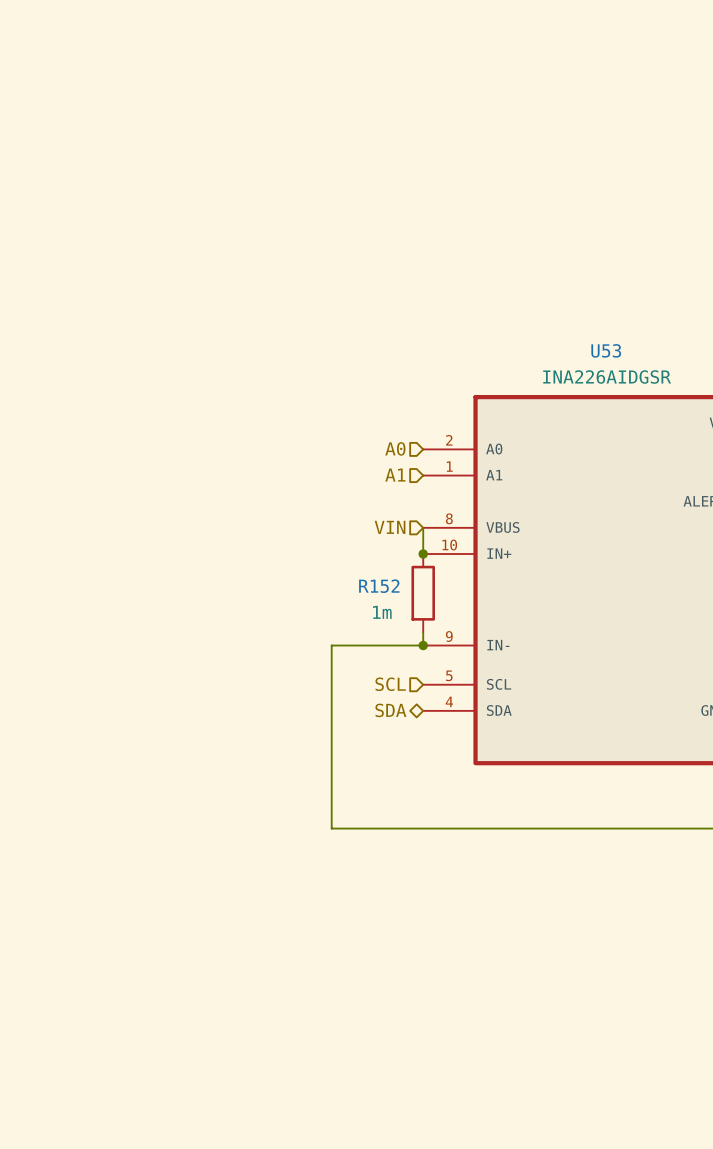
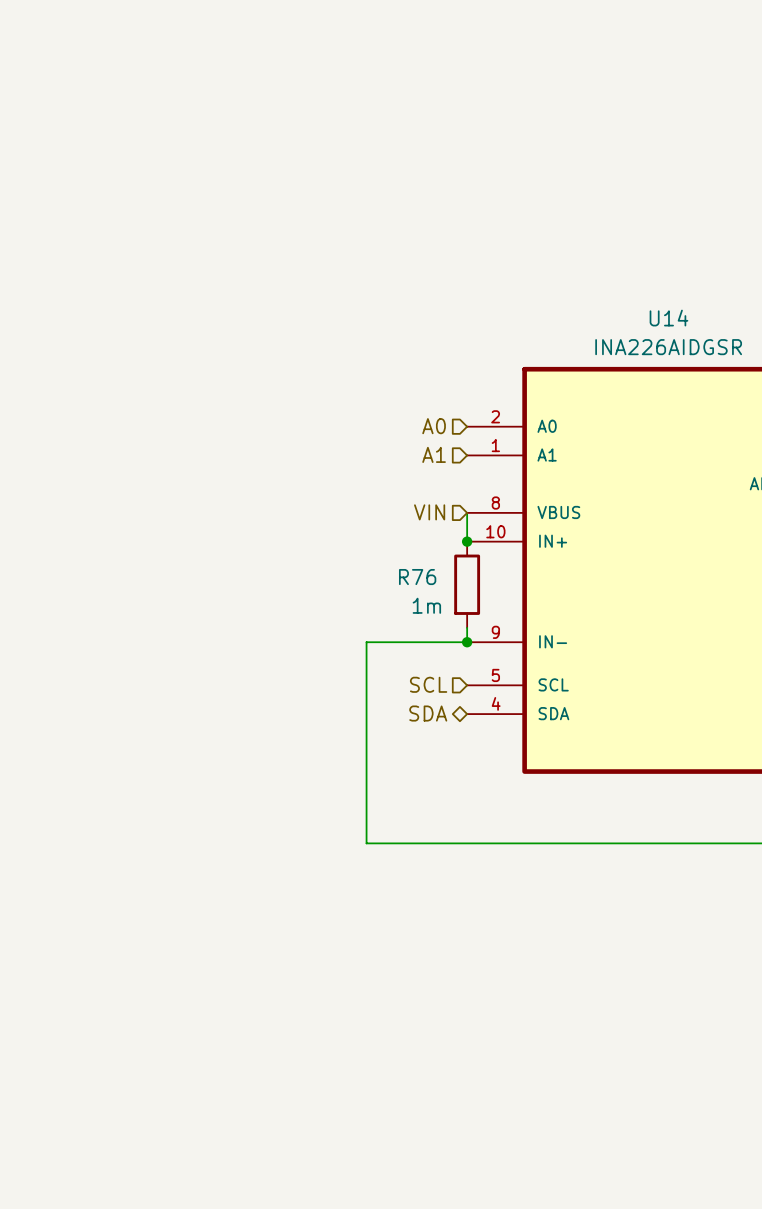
U53 name: U53 (606, 350) -> U14 (668, 318)
R152 name: R152 (379, 586) -> R76 (417, 577)

